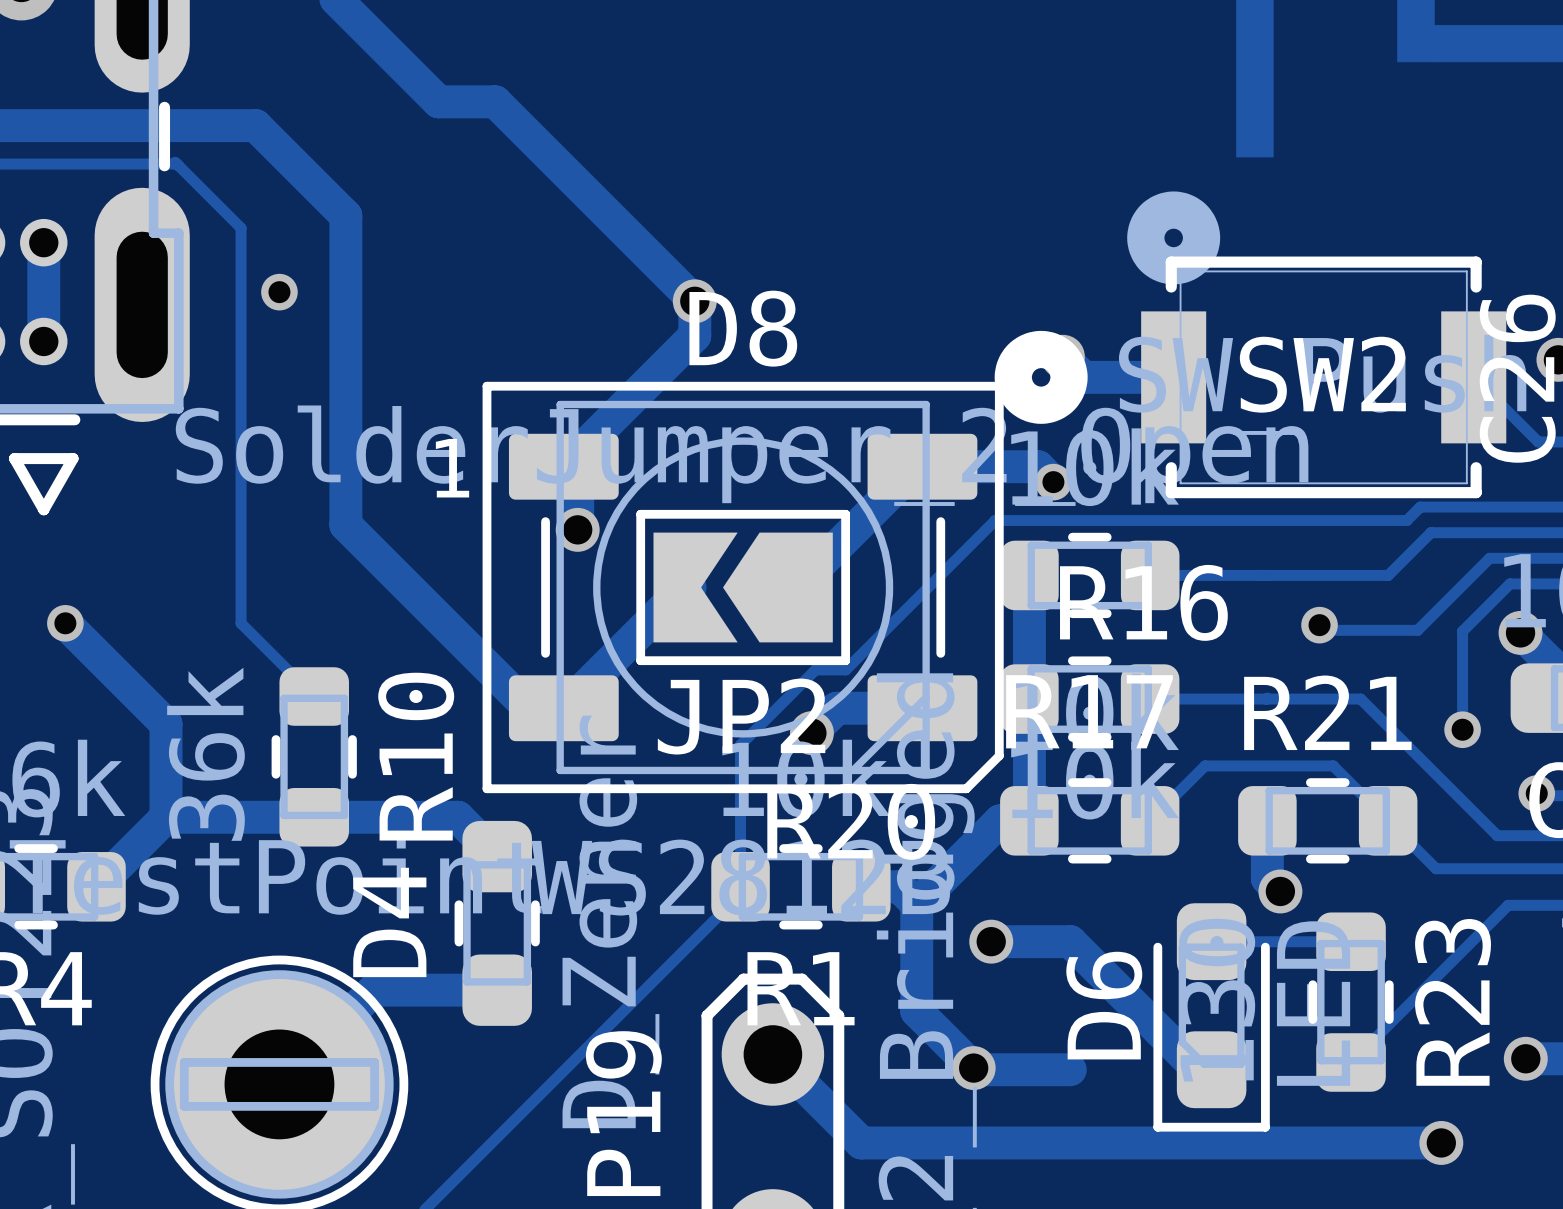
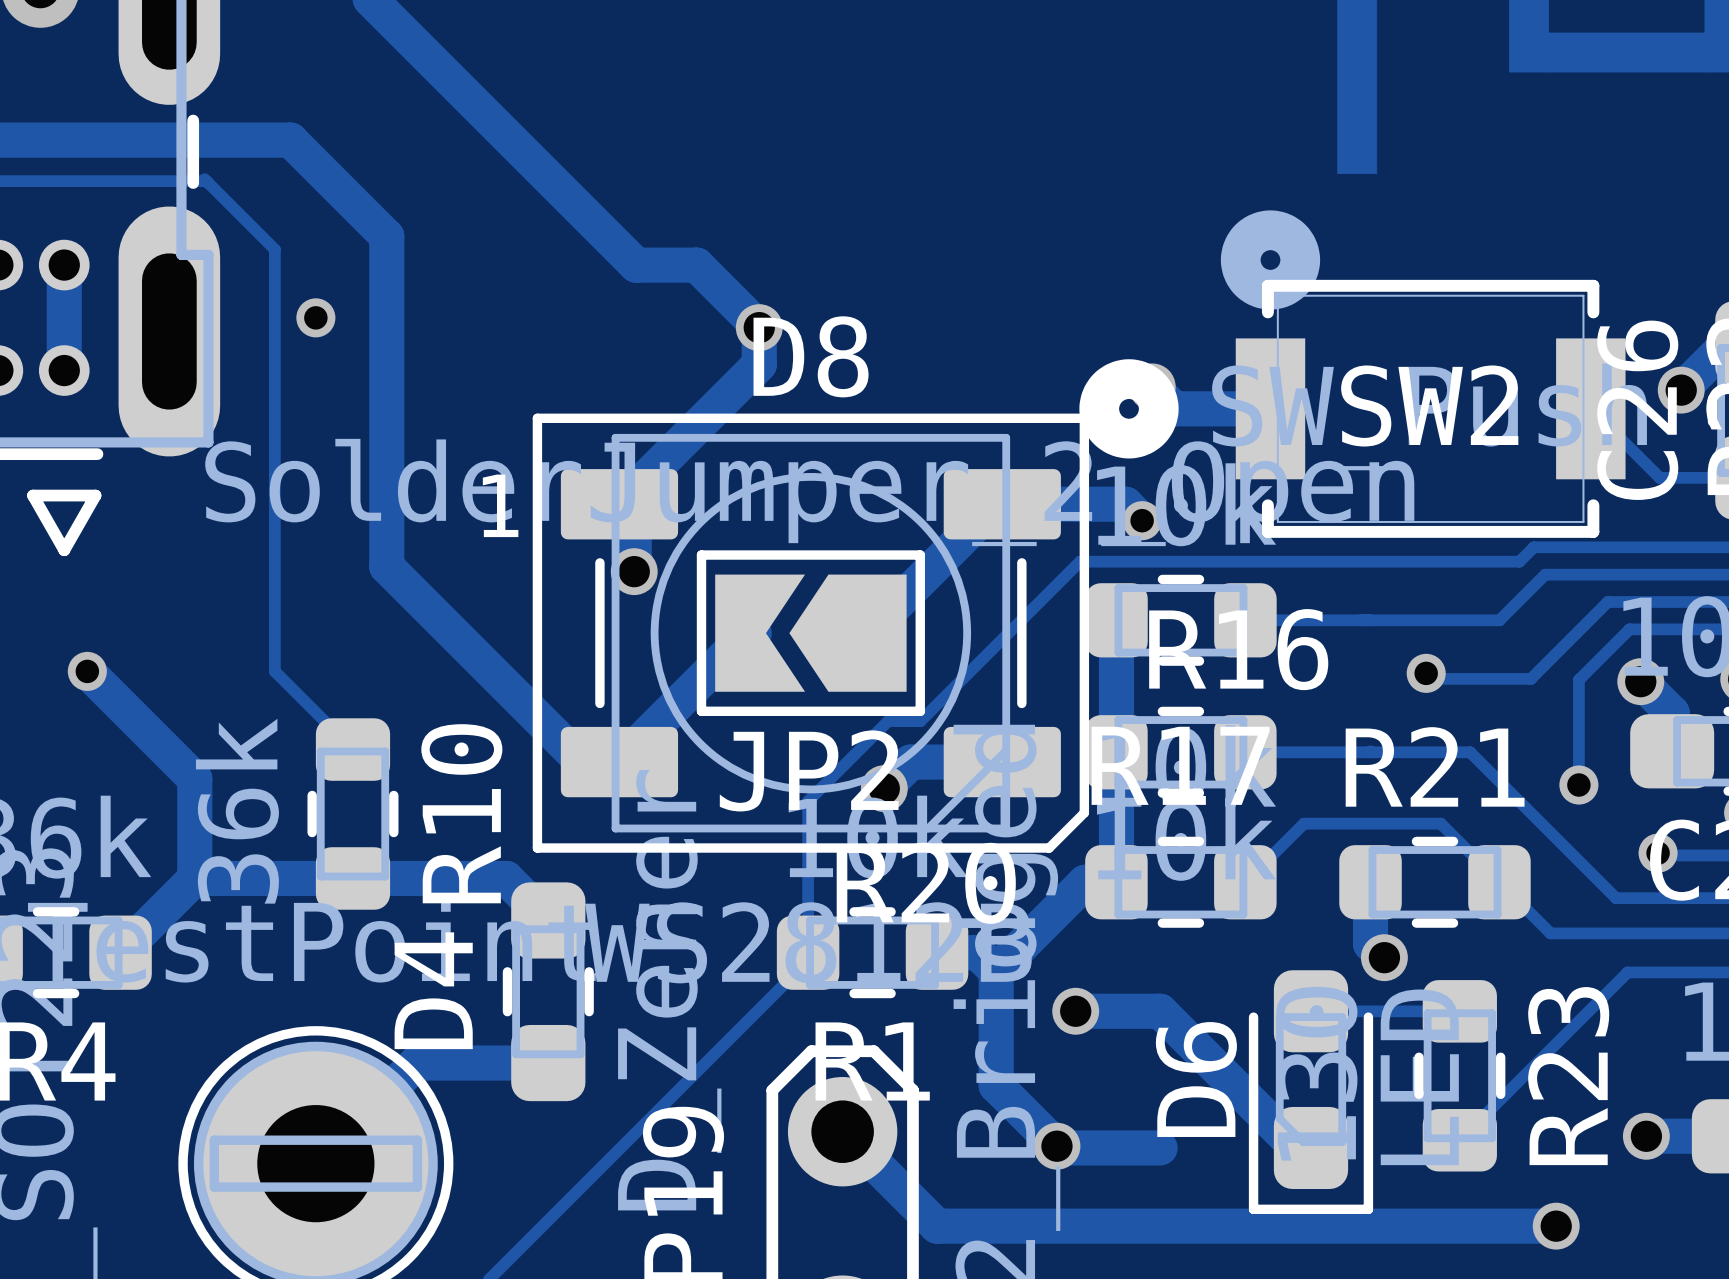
track: (438, 101) (495, 101) (636, 242) -> (485, 114) (636, 265) (696, 265)

